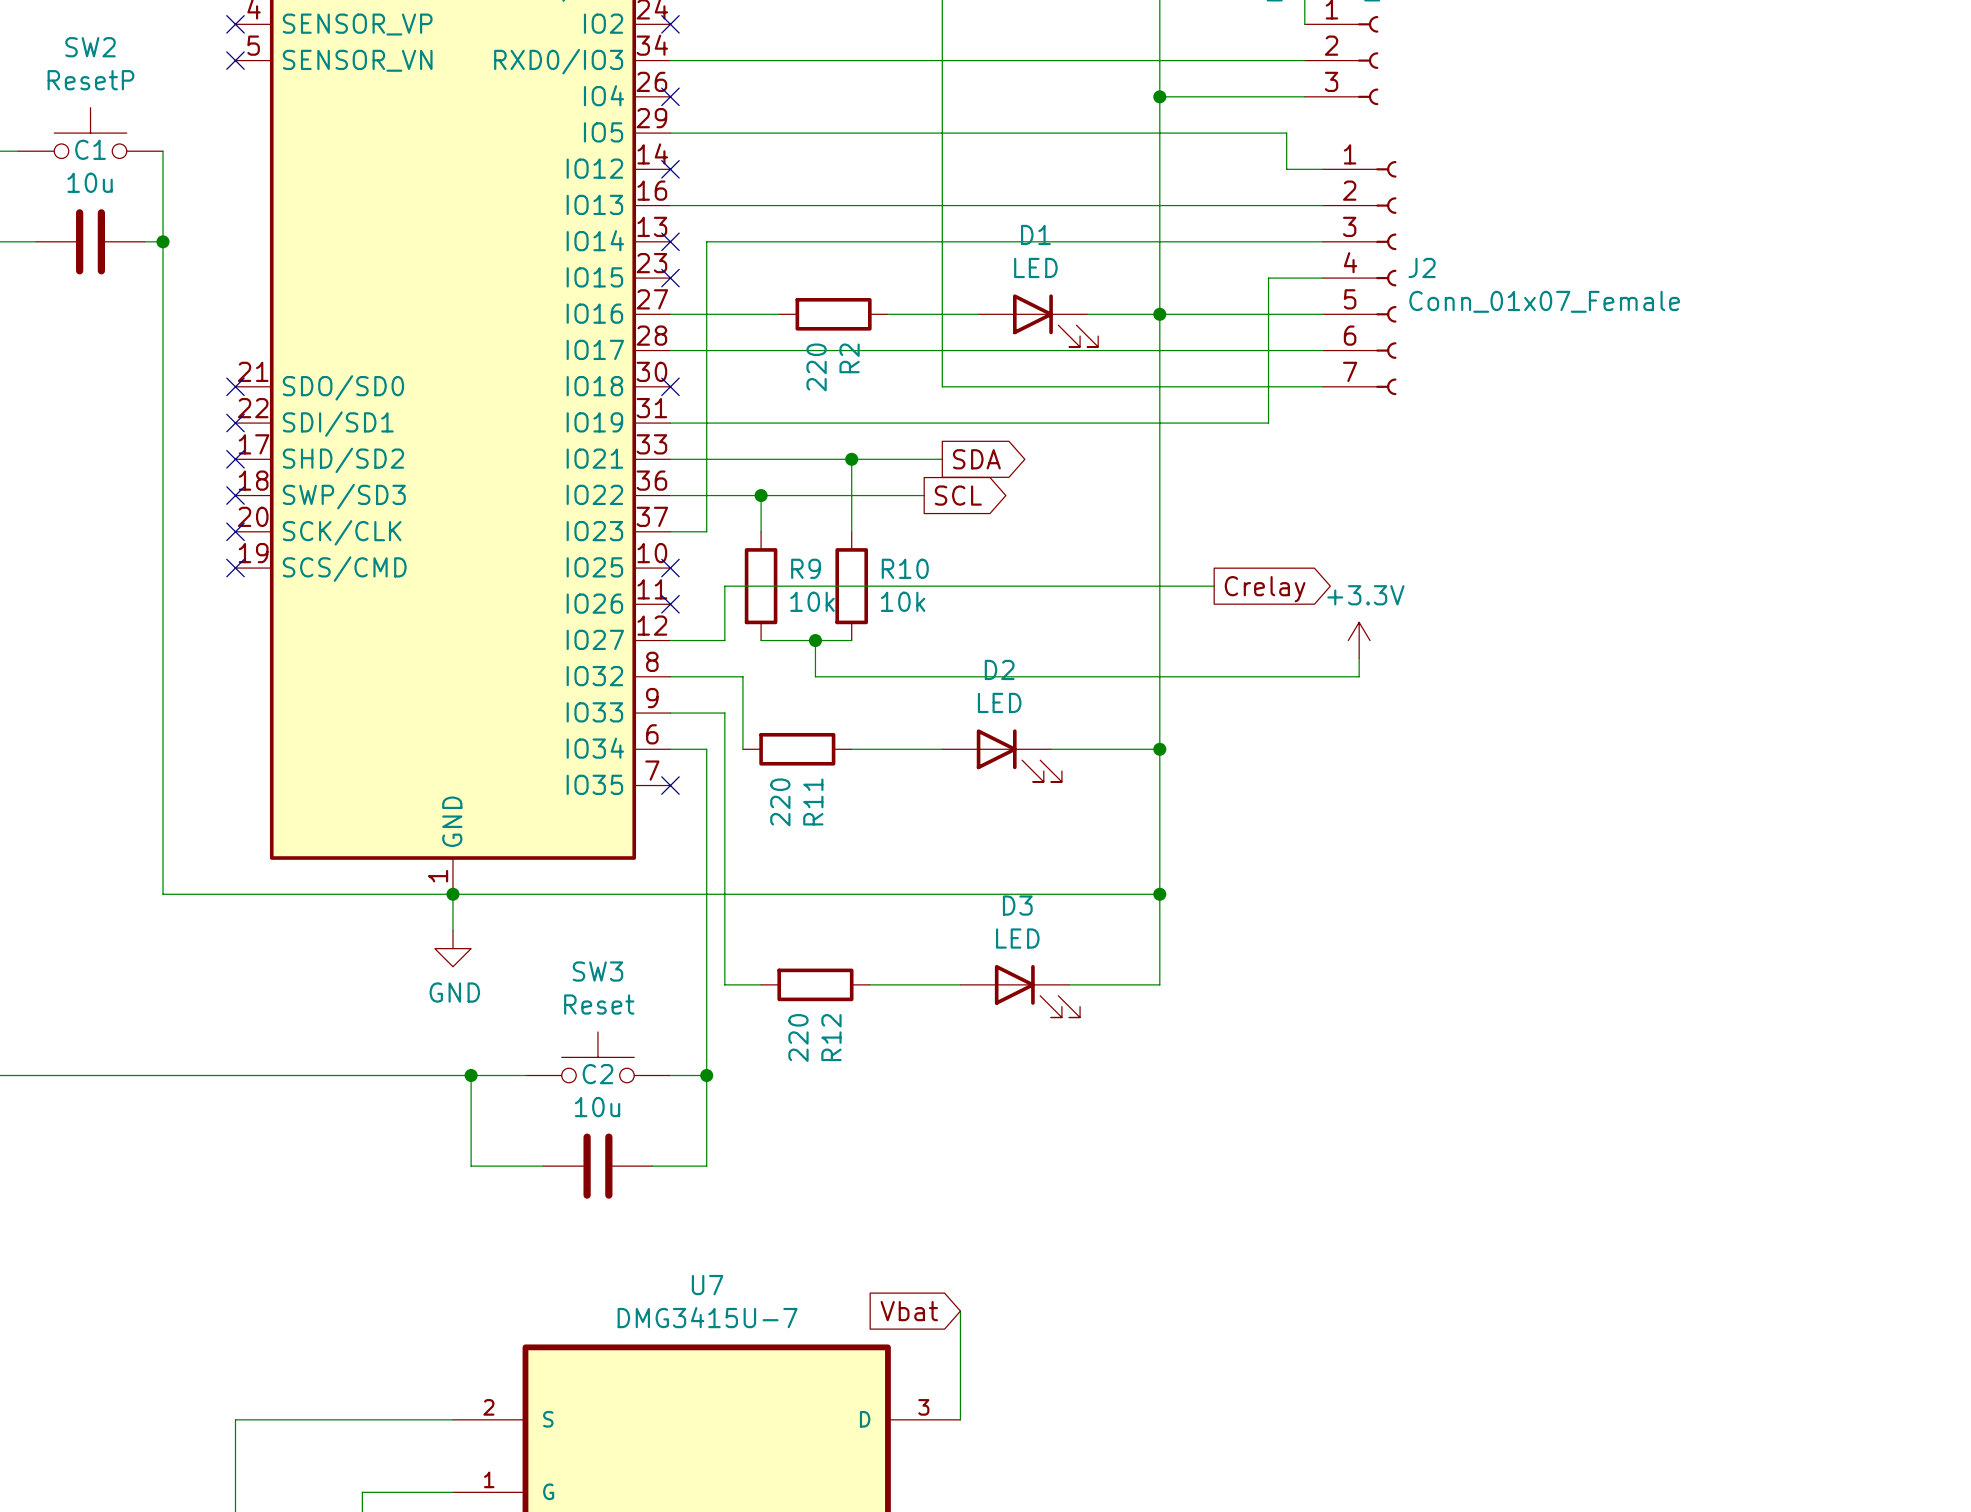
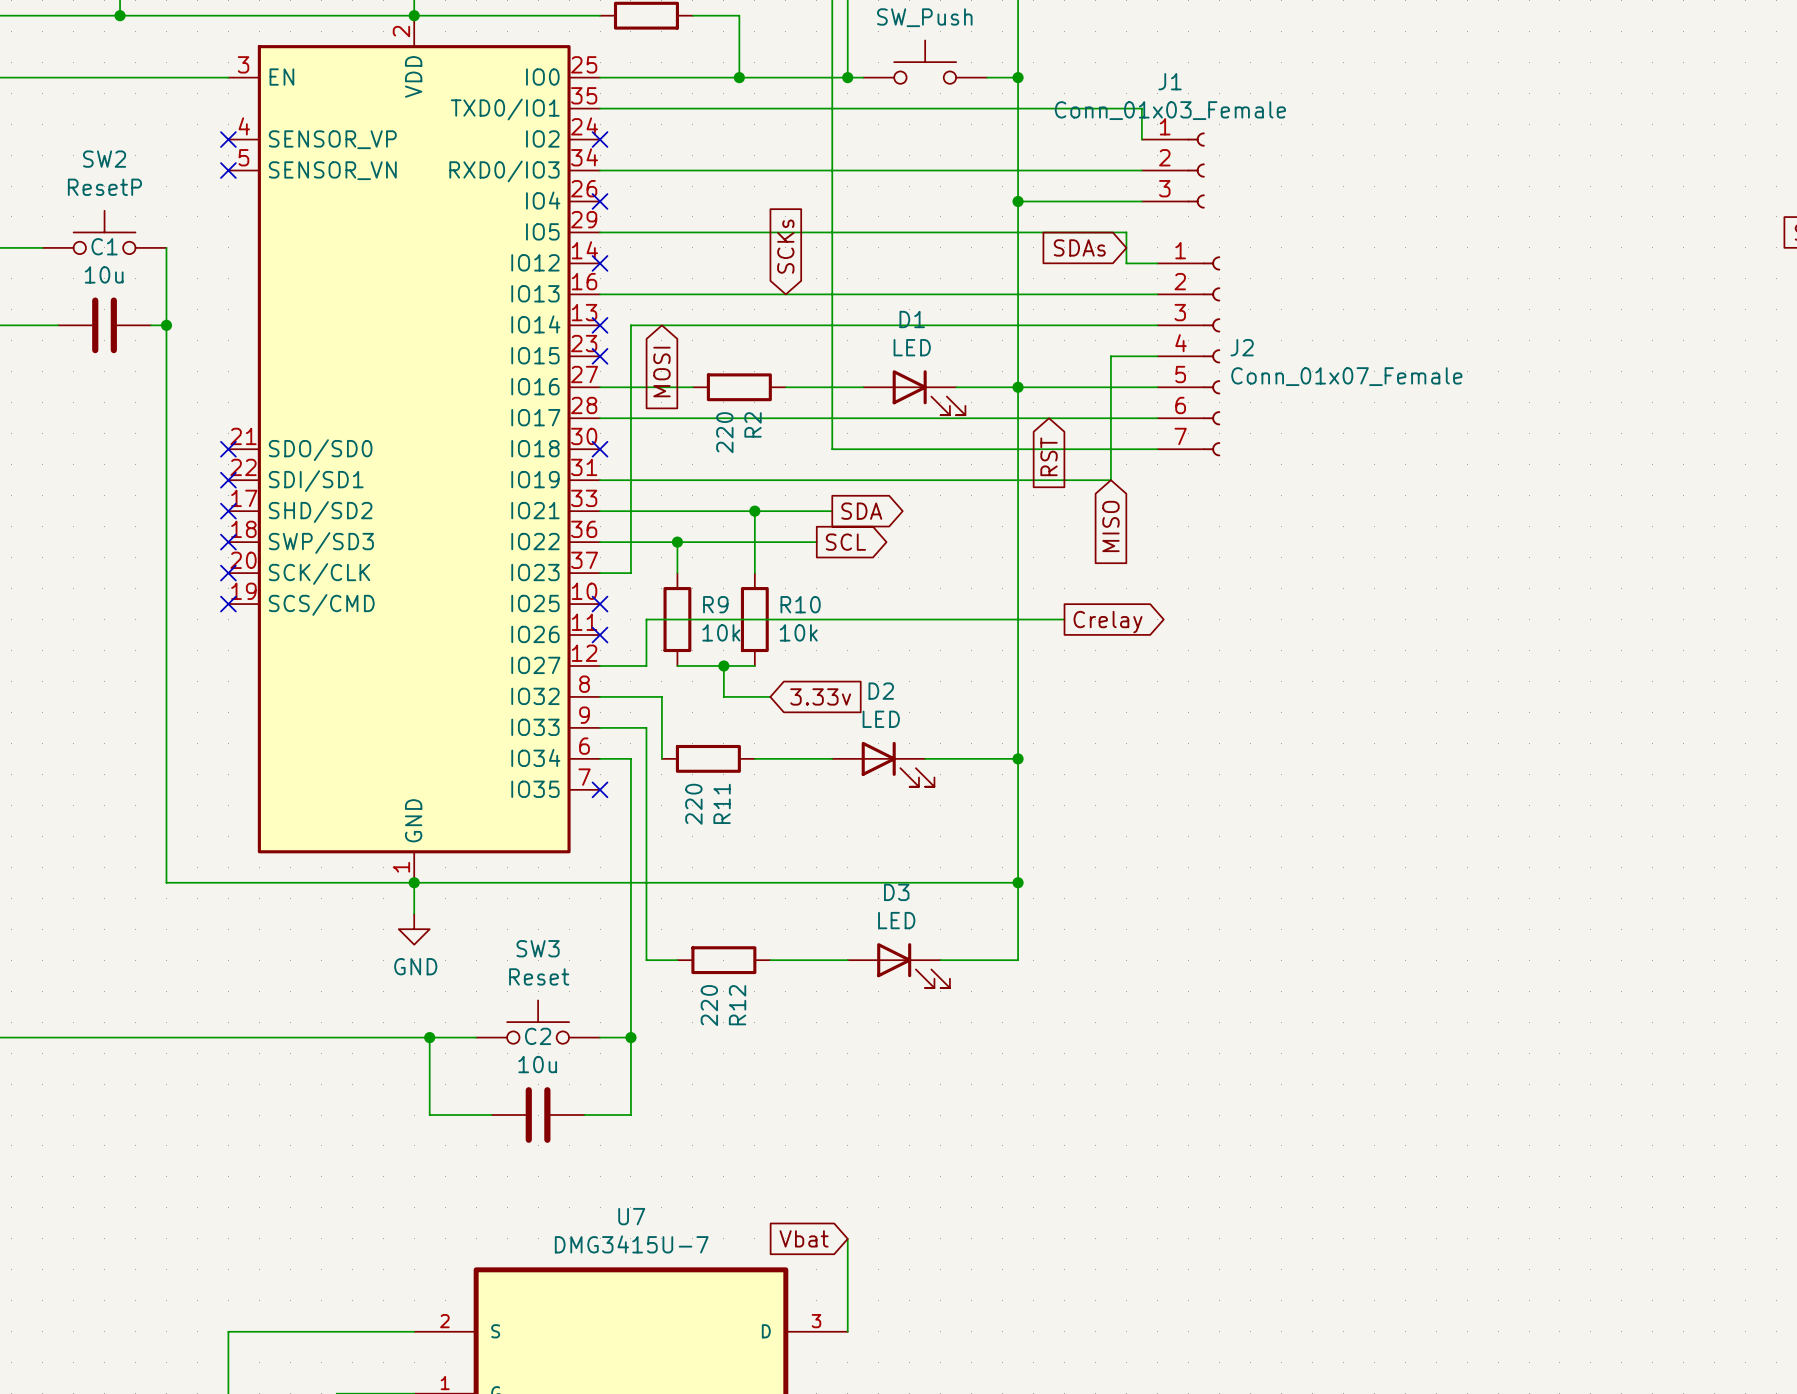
global label: none -> SCKs (785, 246)
global label: none -> SDAs (1079, 247)
global label: none -> MOSI (661, 372)
global label: none -> RST (1049, 456)
global label: none -> MISO (1110, 526)
power symbol: +3.3V (1359, 640) -> none
wire: (1359, 658) (1359, 676) (869, 676) -> none
global label: none -> 3.33v (820, 696)

